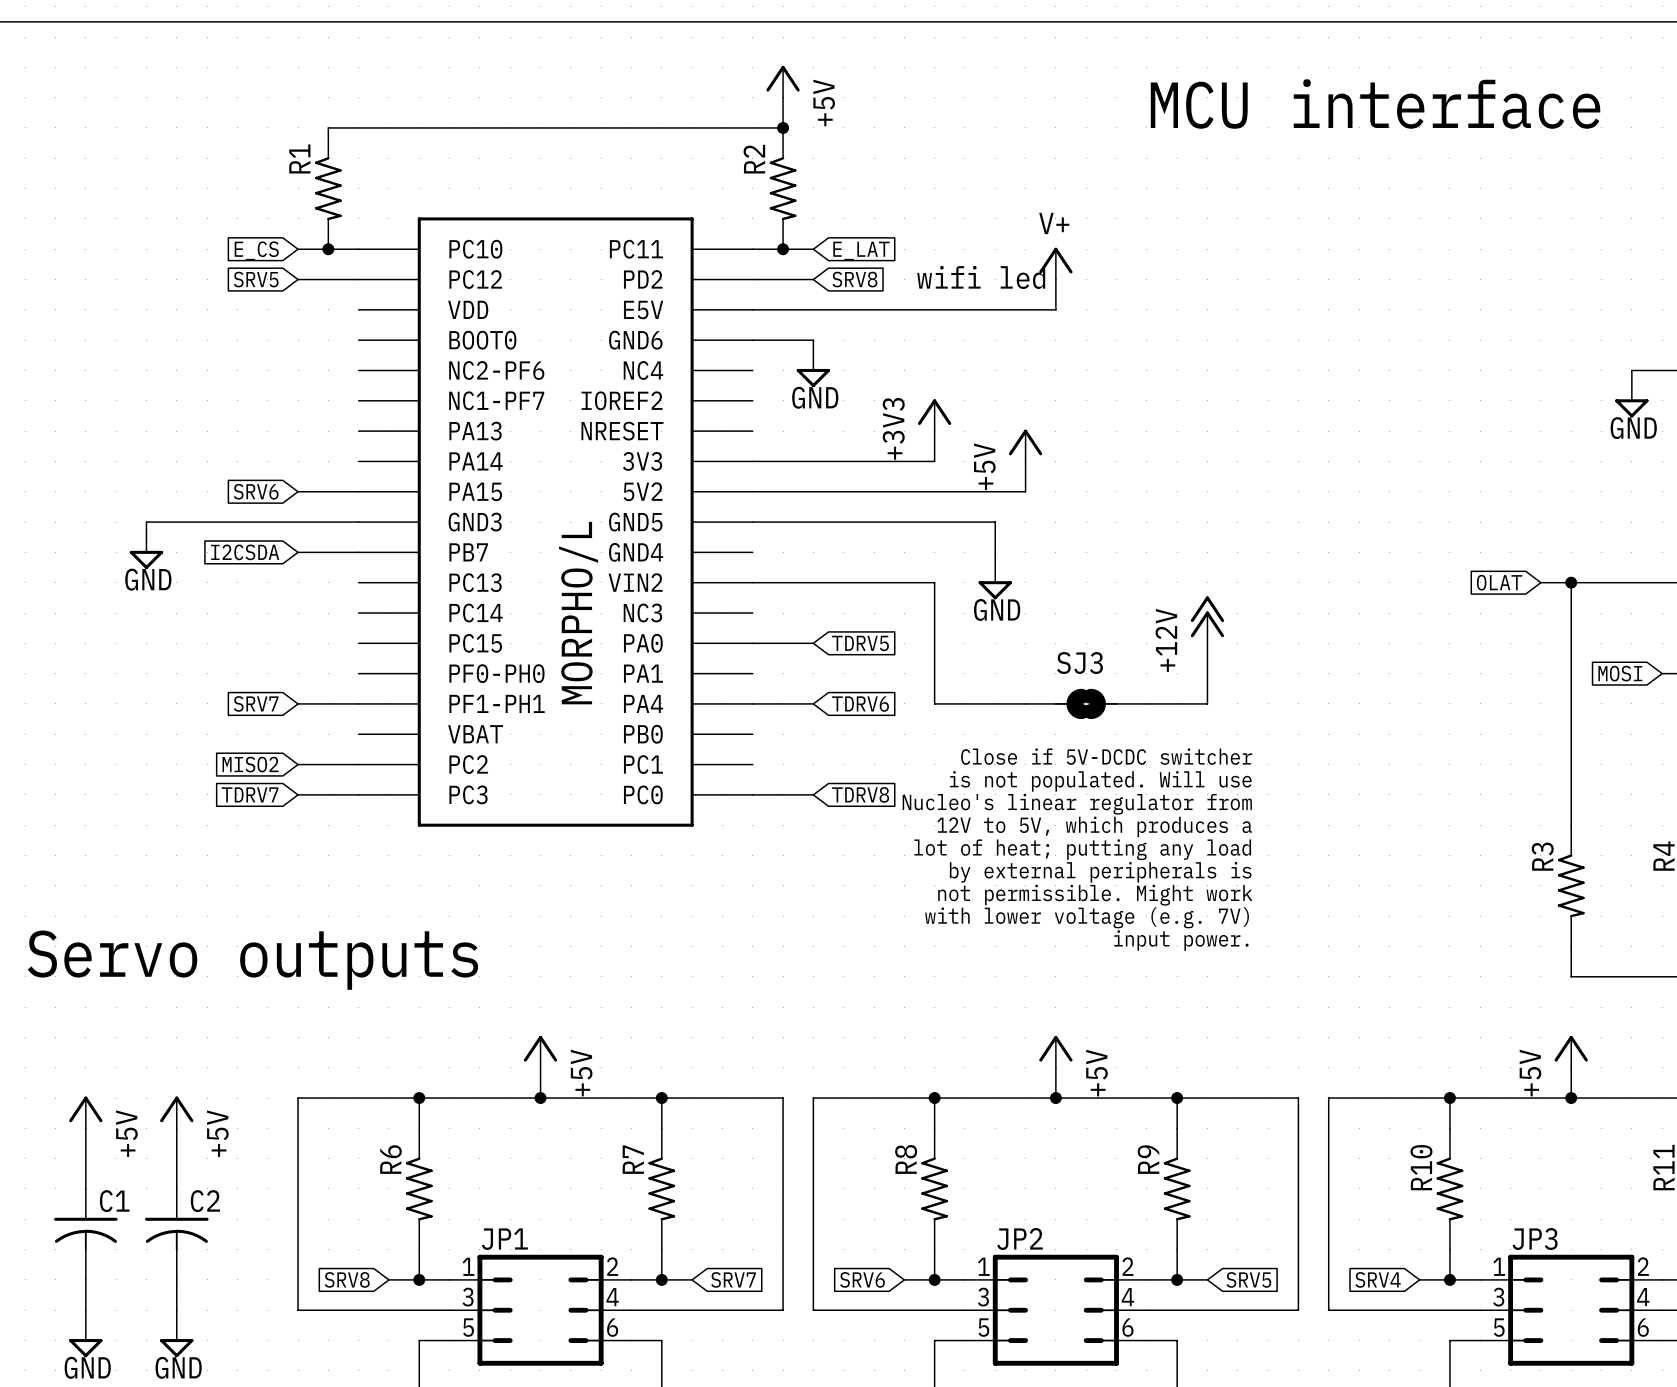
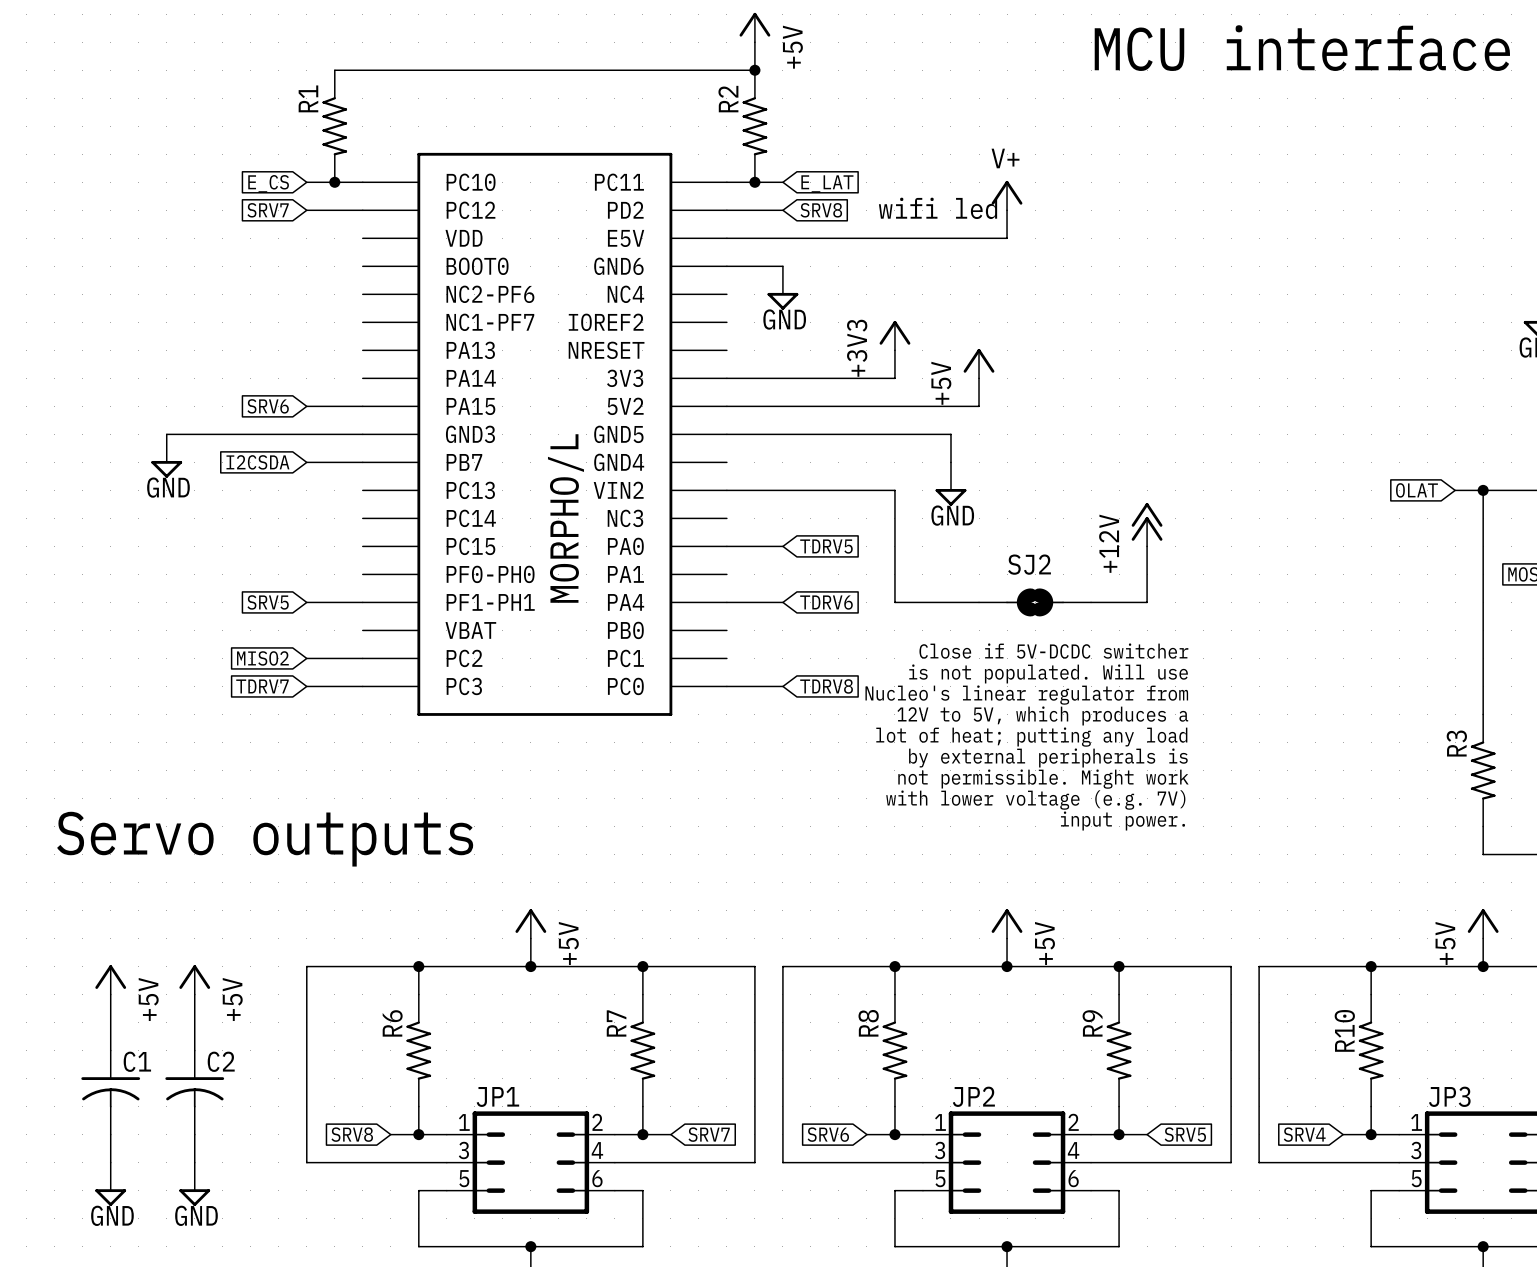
global label: SRV5 (256, 279) -> SRV7 (268, 210)
SJ3 name: SJ3 (1080, 663) -> SJ2 (1029, 564)
global label: SRV7 (256, 703) -> SRV5 (268, 602)

